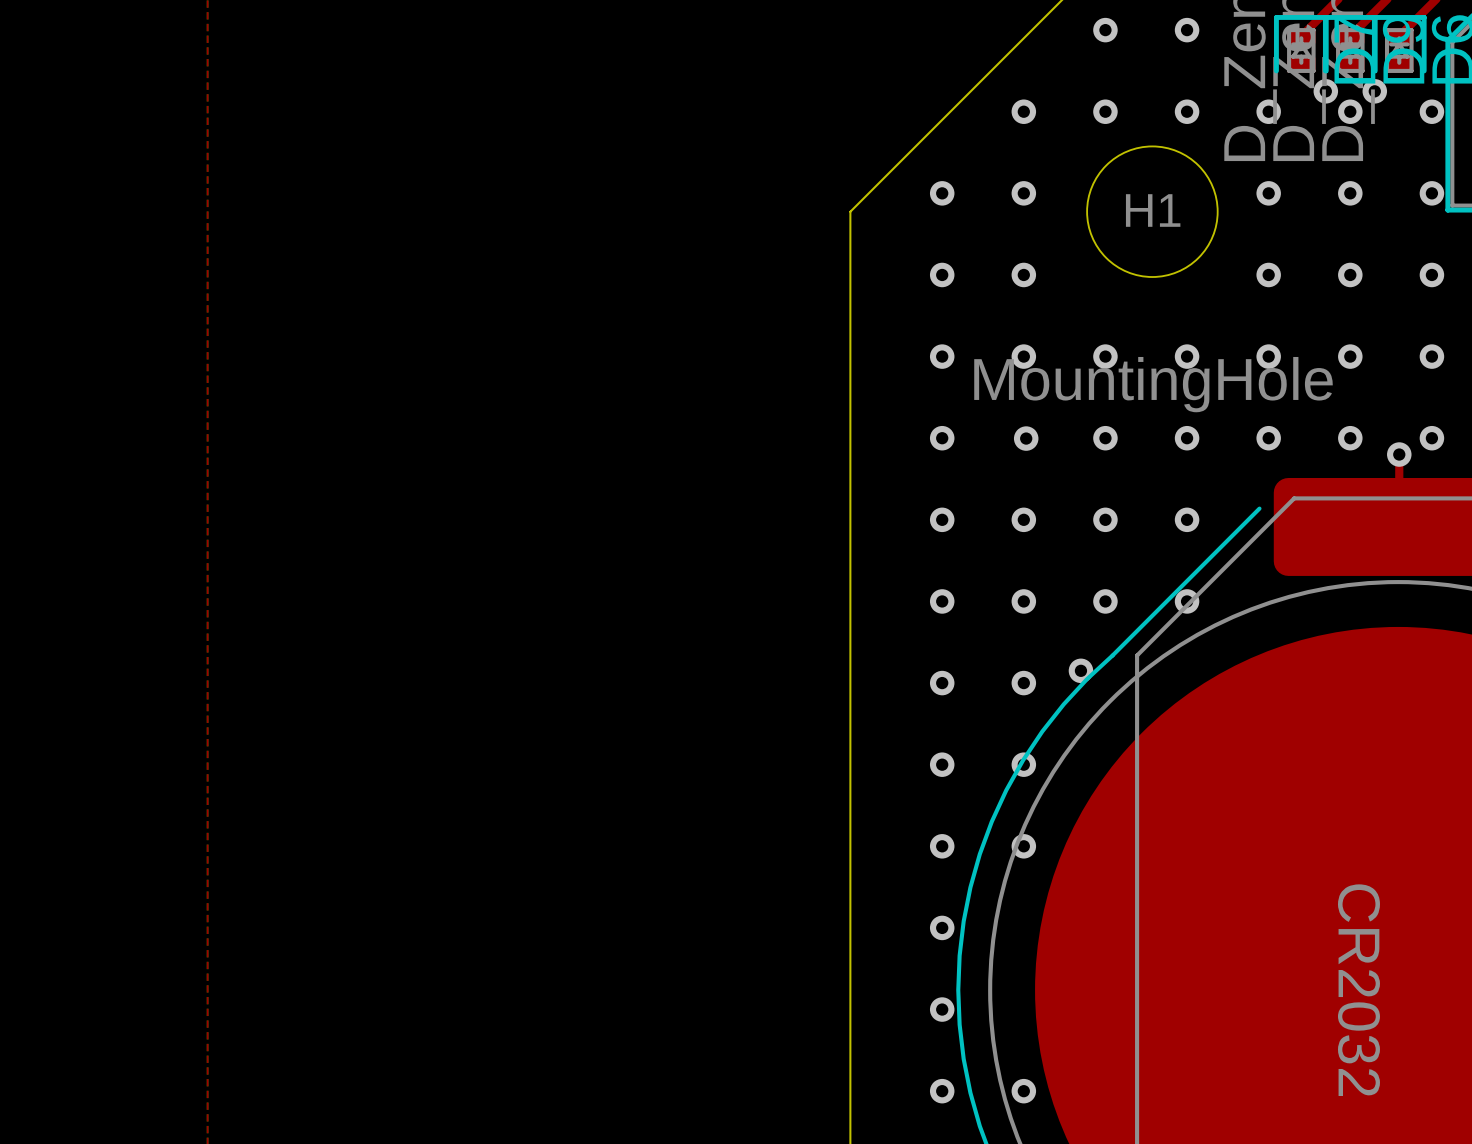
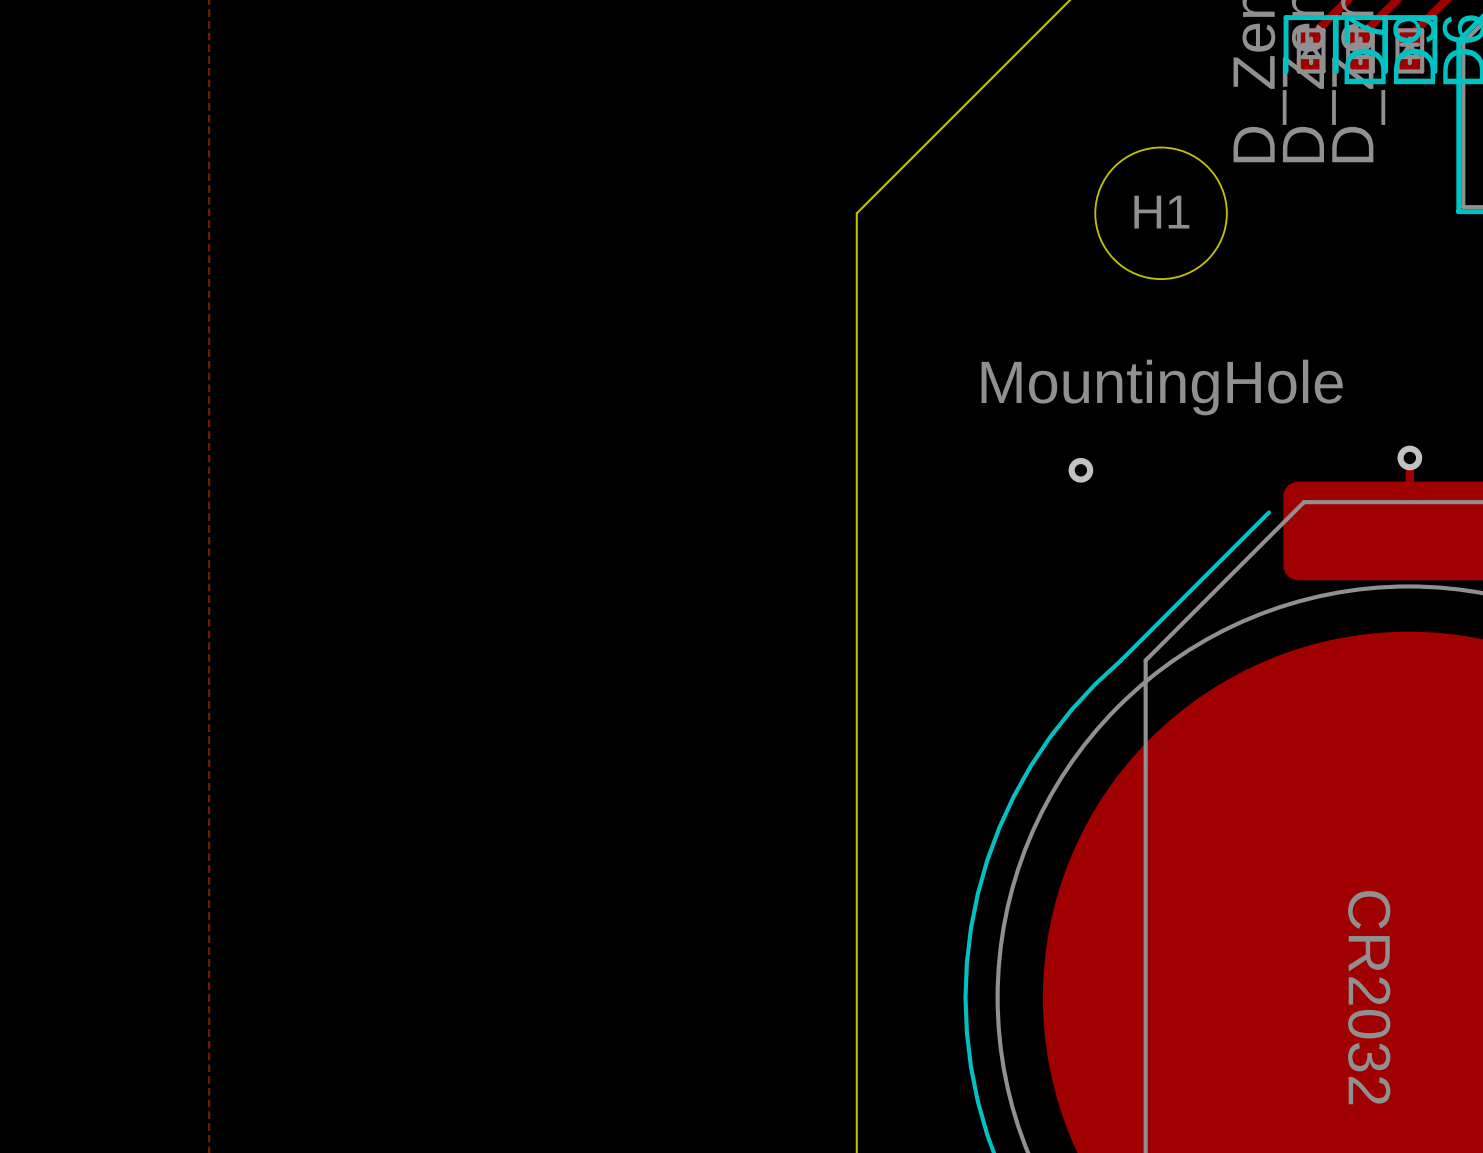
via: (1105, 30) -> none
via: (1187, 30) -> none
via: (1325, 91) -> none
via: (1374, 91) -> none
via: (1023, 111) -> none
via: (1105, 111) -> none
via: (1187, 111) -> none
via: (1268, 111) -> none
via: (1350, 111) -> none
via: (1431, 111) -> none
via: (942, 193) -> none
via: (1023, 193) -> none
via: (1268, 193) -> none
via: (1350, 193) -> none
via: (1431, 193) -> none
via: (942, 274) -> none
via: (1023, 274) -> none
via: (1268, 274) -> none
via: (1350, 274) -> none
via: (1431, 274) -> none
via: (942, 356) -> none
via: (1023, 356) -> none
via: (1105, 356) -> none
via: (1187, 356) -> none
via: (1268, 356) -> none
via: (1350, 356) -> none
via: (1431, 356) -> none
via: (942, 438) -> none
via: (1026, 438) -> none
via: (1105, 438) -> none
via: (1187, 438) -> none
via: (1268, 438) -> none
via: (1350, 438) -> none
via: (1431, 438) -> none
via: none -> (1080, 470)
via: (942, 519) -> none
via: (1023, 519) -> none
via: (1105, 519) -> none
via: (1187, 519) -> none
via: (942, 601) -> none
via: (1023, 601) -> none
via: (1105, 601) -> none
via: (1187, 601) -> none
via: (1080, 670) -> none
via: (942, 683) -> none
via: (1023, 683) -> none
via: (942, 764) -> none
via: (1023, 764) -> none
via: (942, 846) -> none
via: (1023, 846) -> none
via: (942, 927) -> none
via: (942, 1009) -> none
via: (942, 1091) -> none
via: (1023, 1091) -> none

